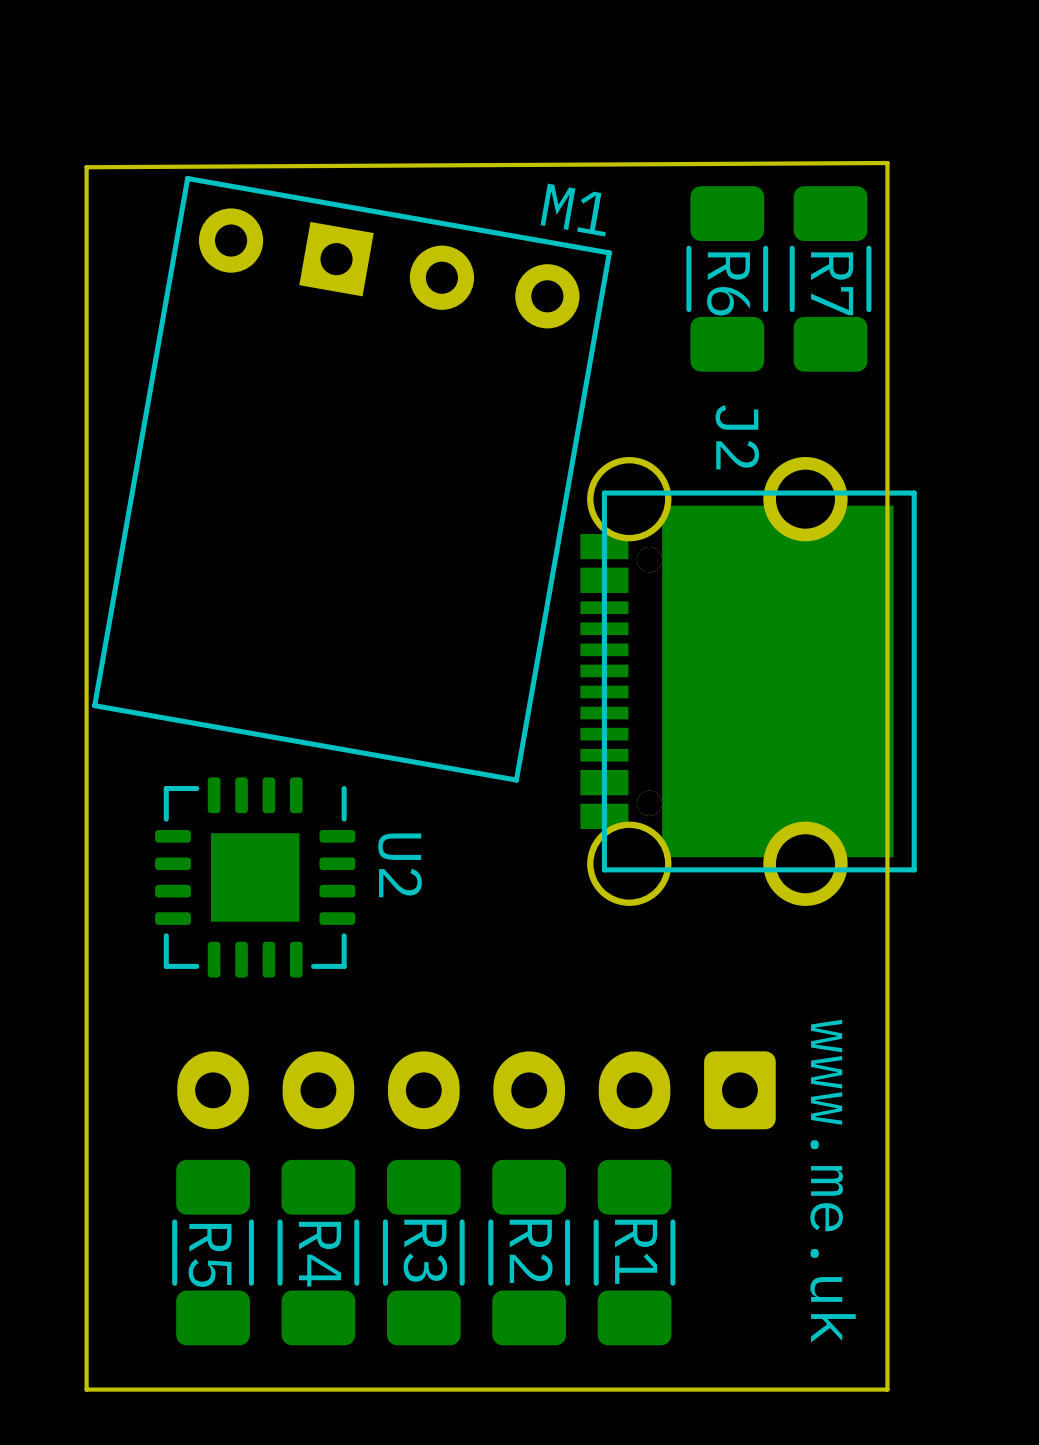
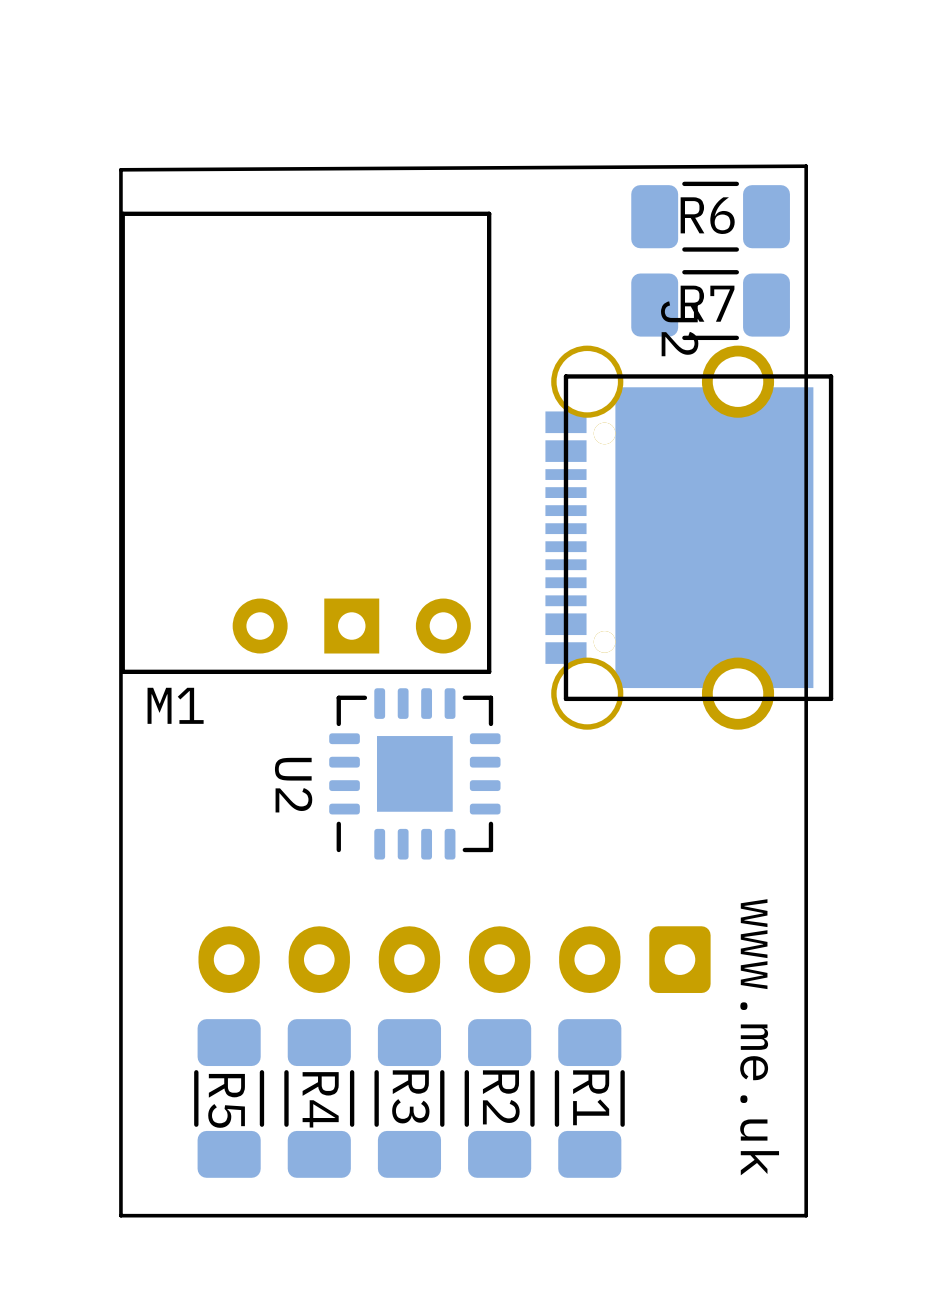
M1 footprint: [92, 176, 612, 783] -> [120, 211, 492, 674]
M1 name position: M1 (573, 210) -> M1 (175, 705)
R6 rotation: 0° (727, 278) -> 90° clockwise (710, 216)
R7 rotation: 0° (830, 278) -> 90° clockwise (710, 305)
J2 position: (748, 681) -> (689, 537)
U2 rotation: 0° (255, 877) -> 180° (414, 773)
U2 position: (255, 877) -> (414, 773)

